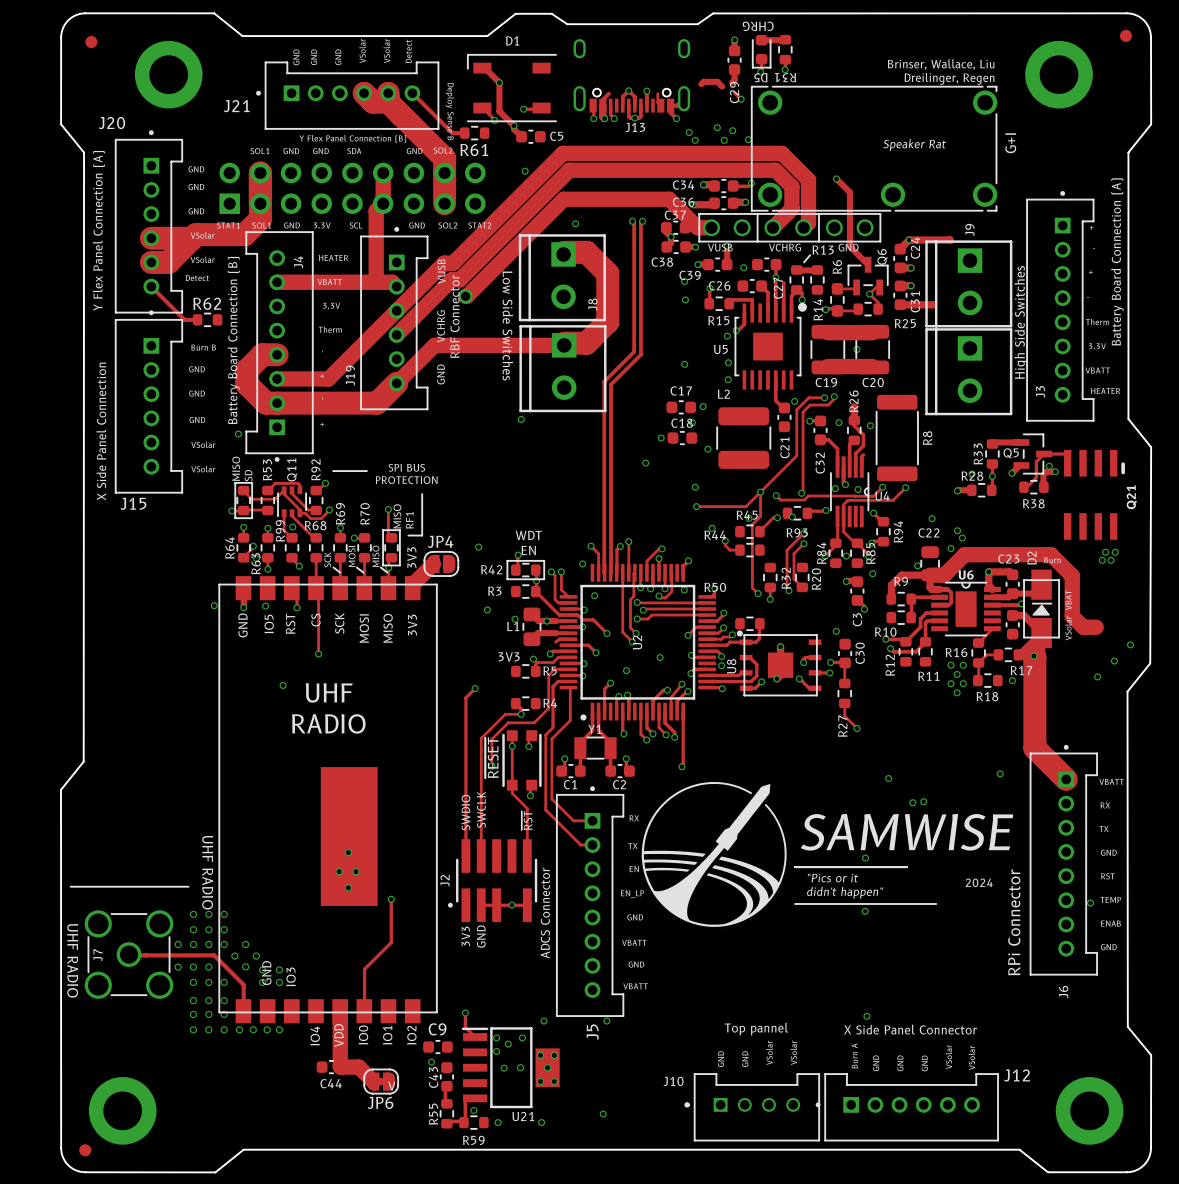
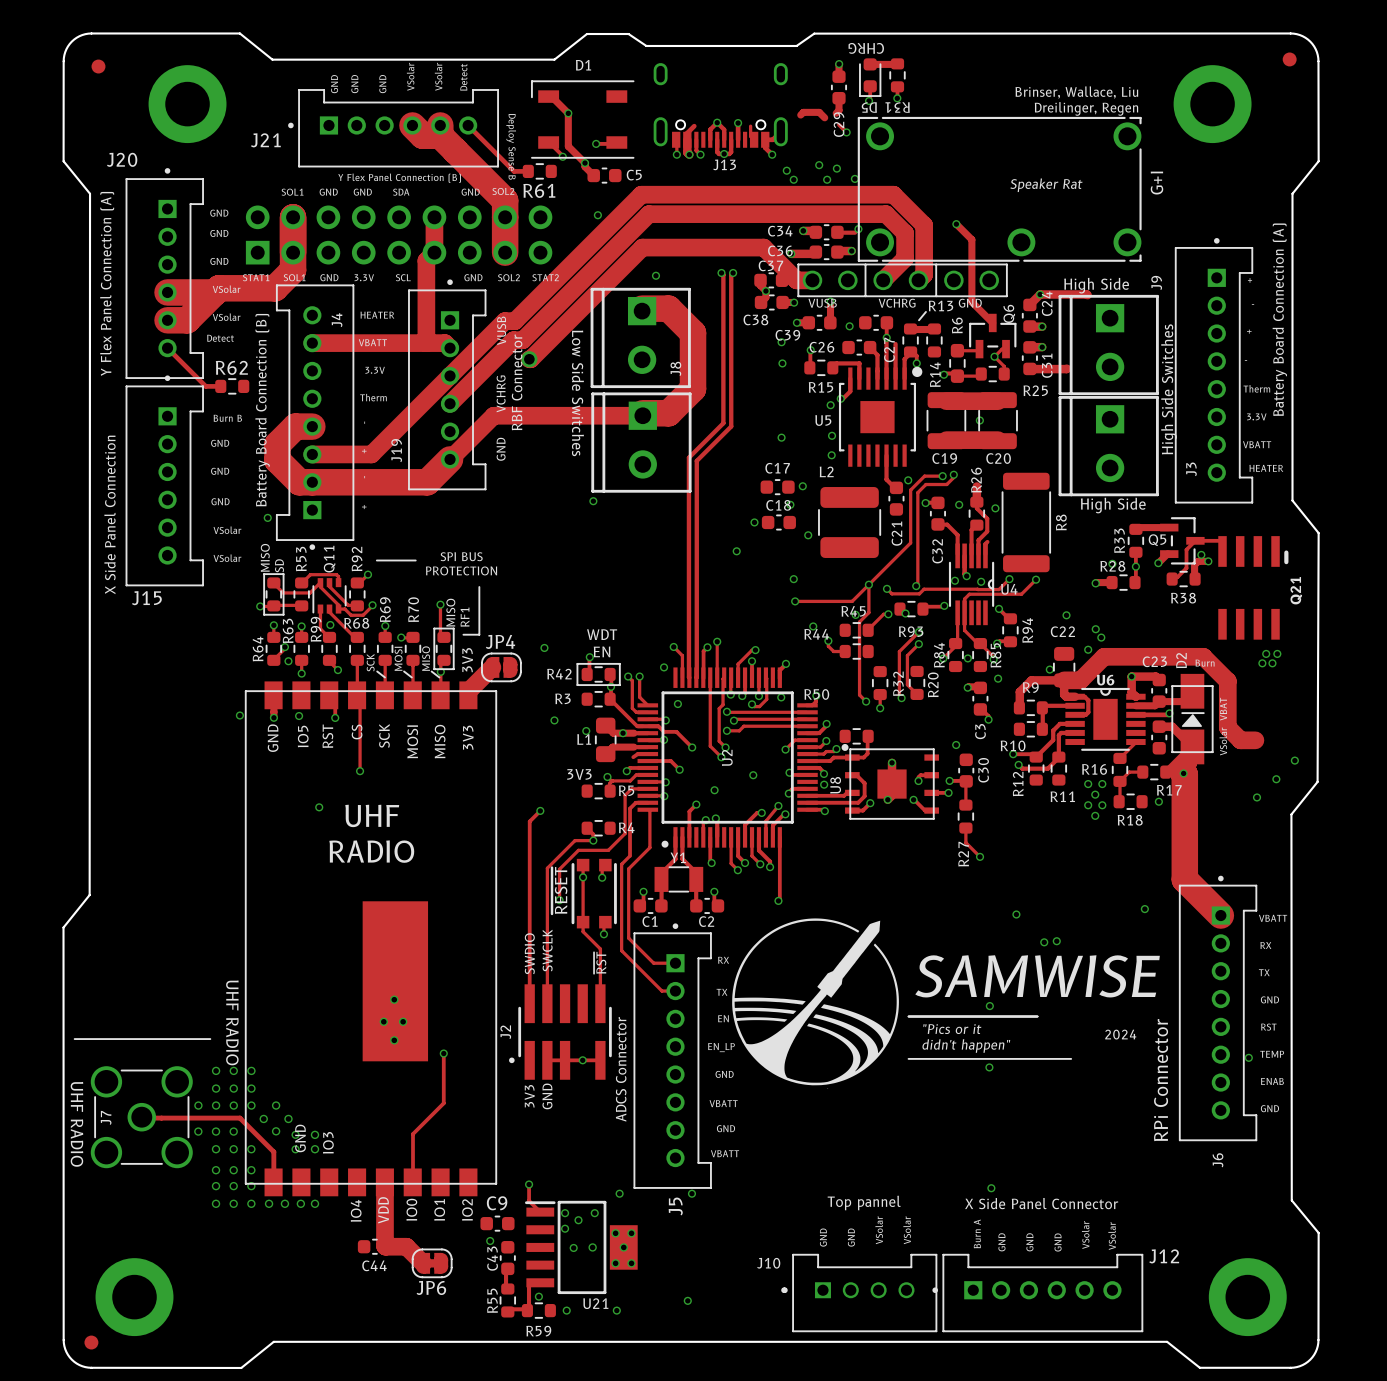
J9 name position: J9 (969, 230) -> J9 (1156, 282)
text: none -> High Side (1096, 285)
text: none -> High Side (1113, 505)
R63 name position: R63 (256, 563) -> R63 (288, 630)
text: V (391, 1086) -> none

